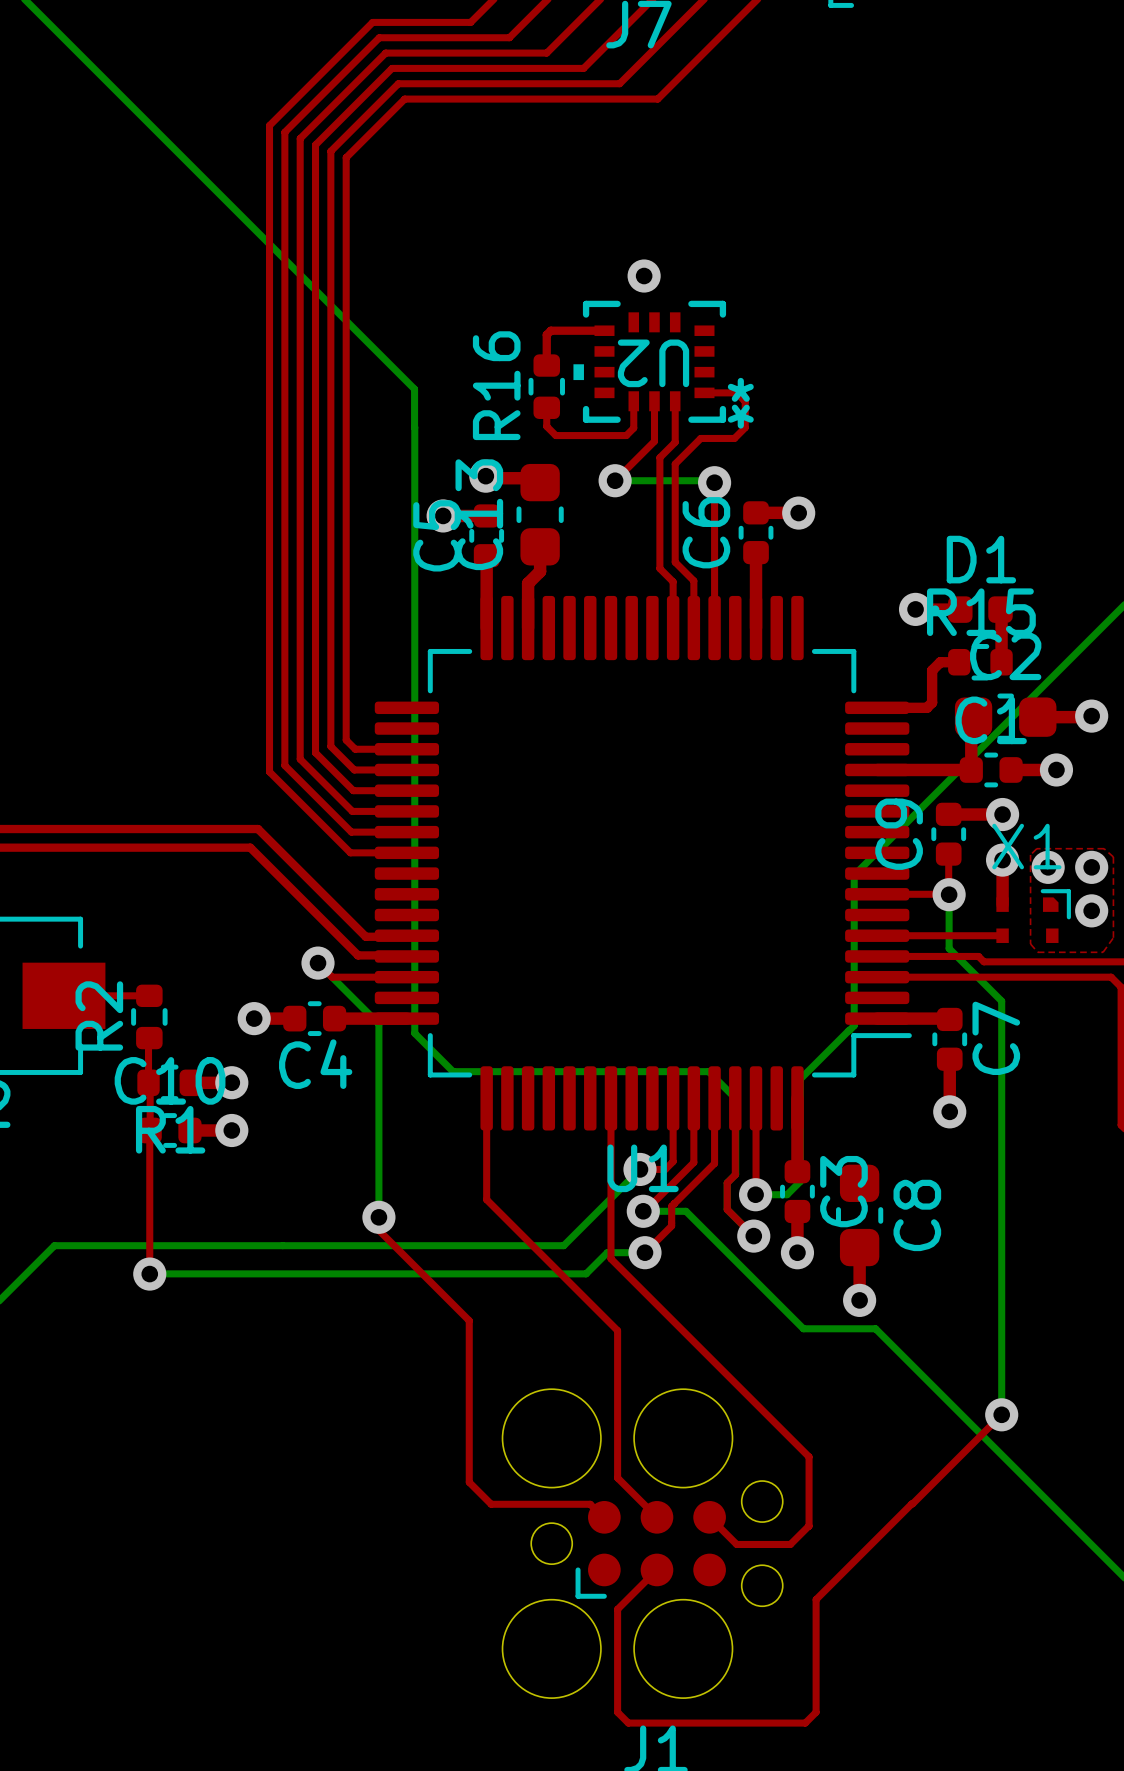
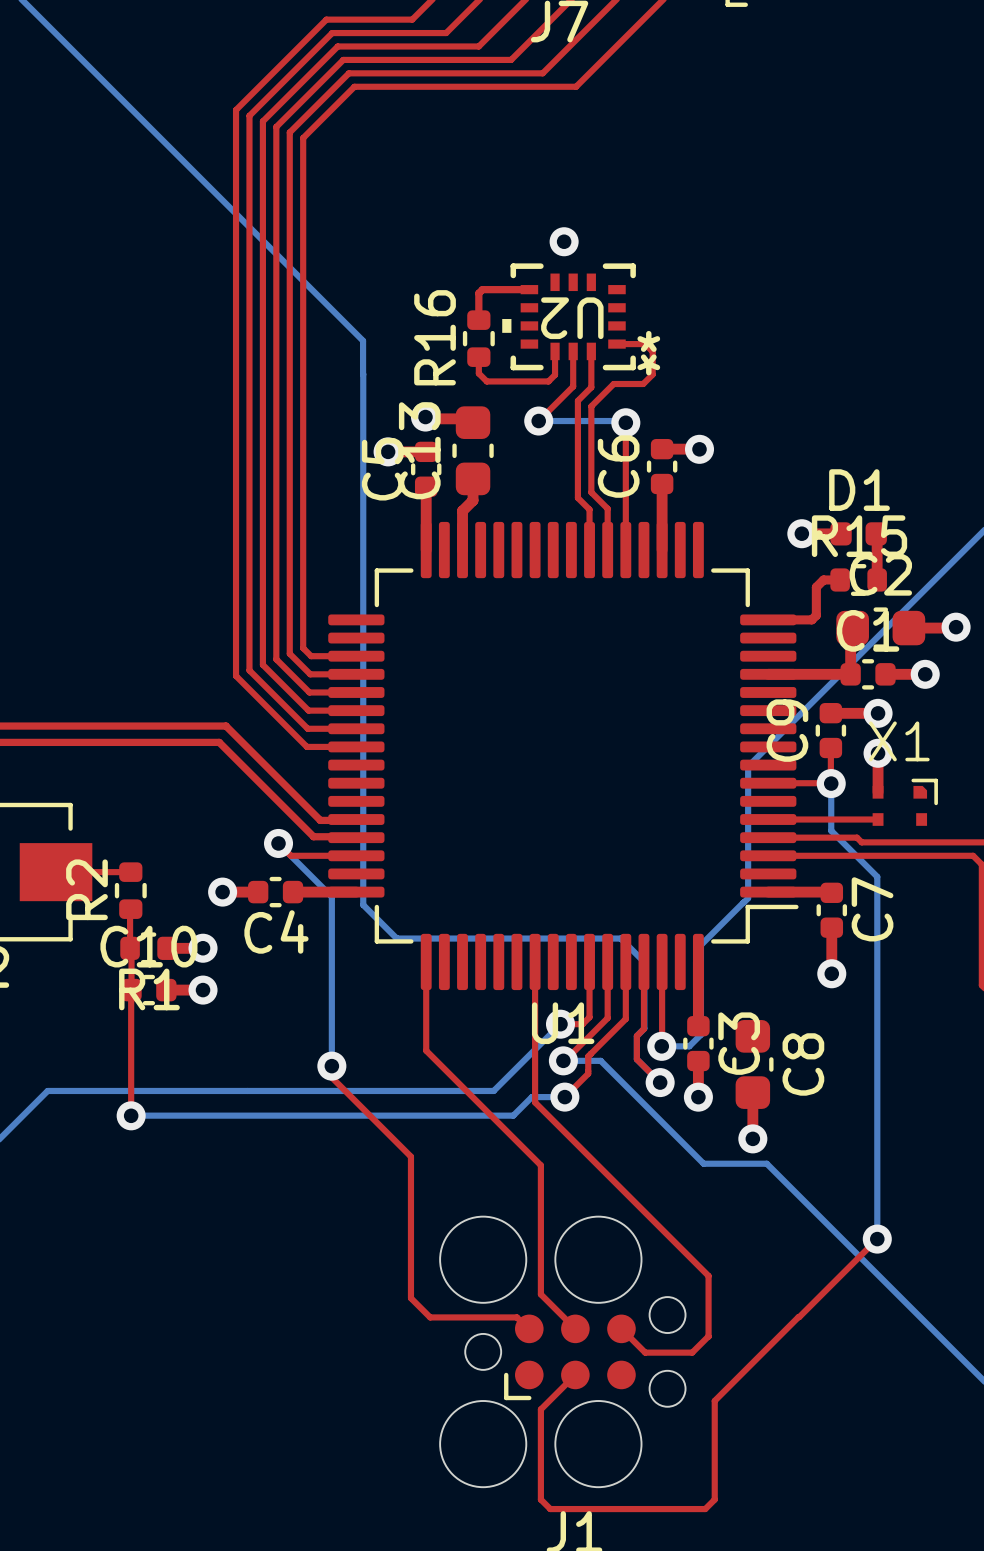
top zone outline: (1036, 848) (1030, 854) (1030, 944) (1037, 952) (1103, 952) (1113, 937) (1113, 857) (1104, 848) (1036, 848) -> none
via: (1048, 867) -> none
via: (1091, 867) -> none
via: (1091, 910) -> none

